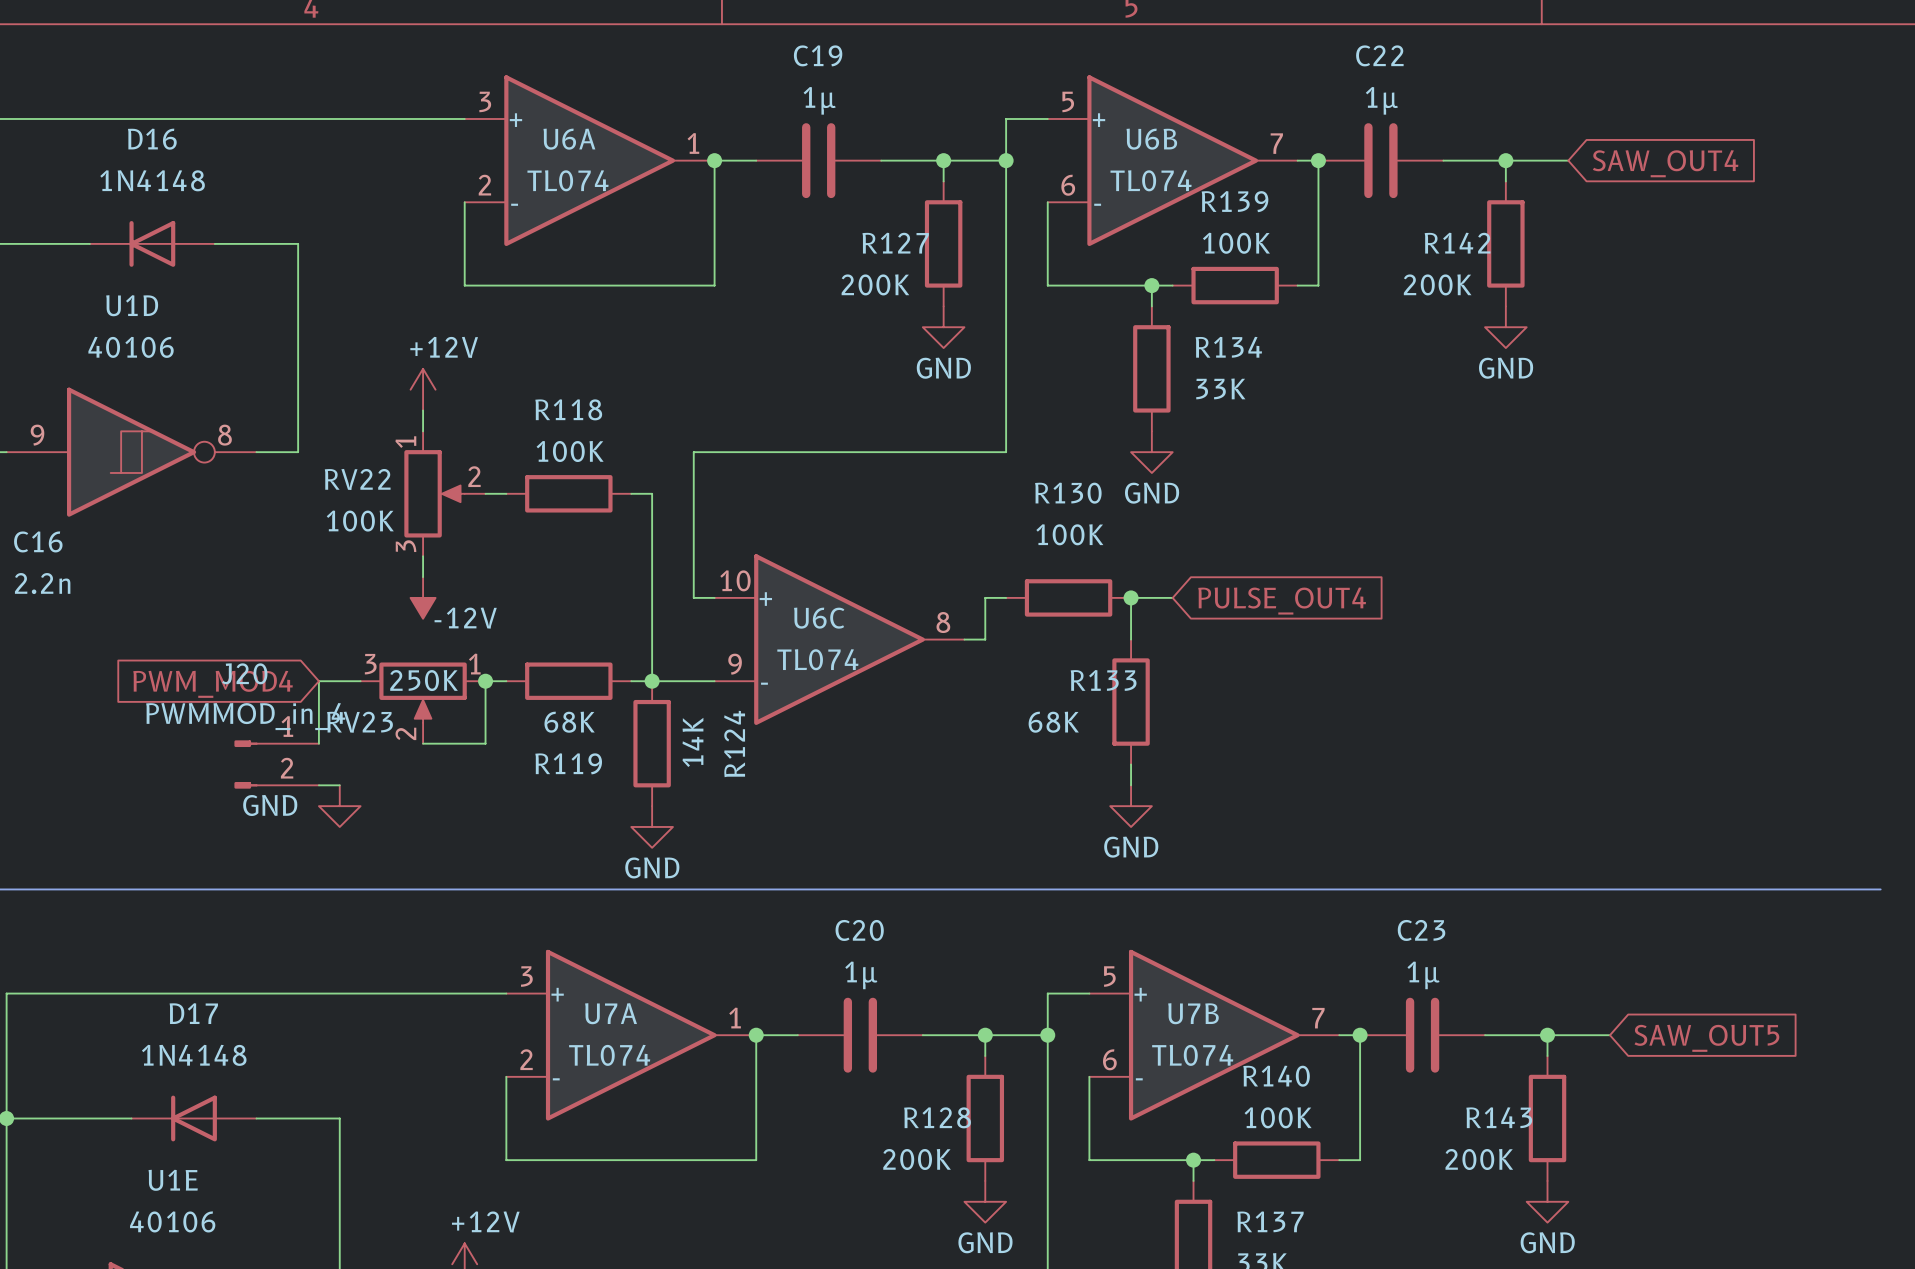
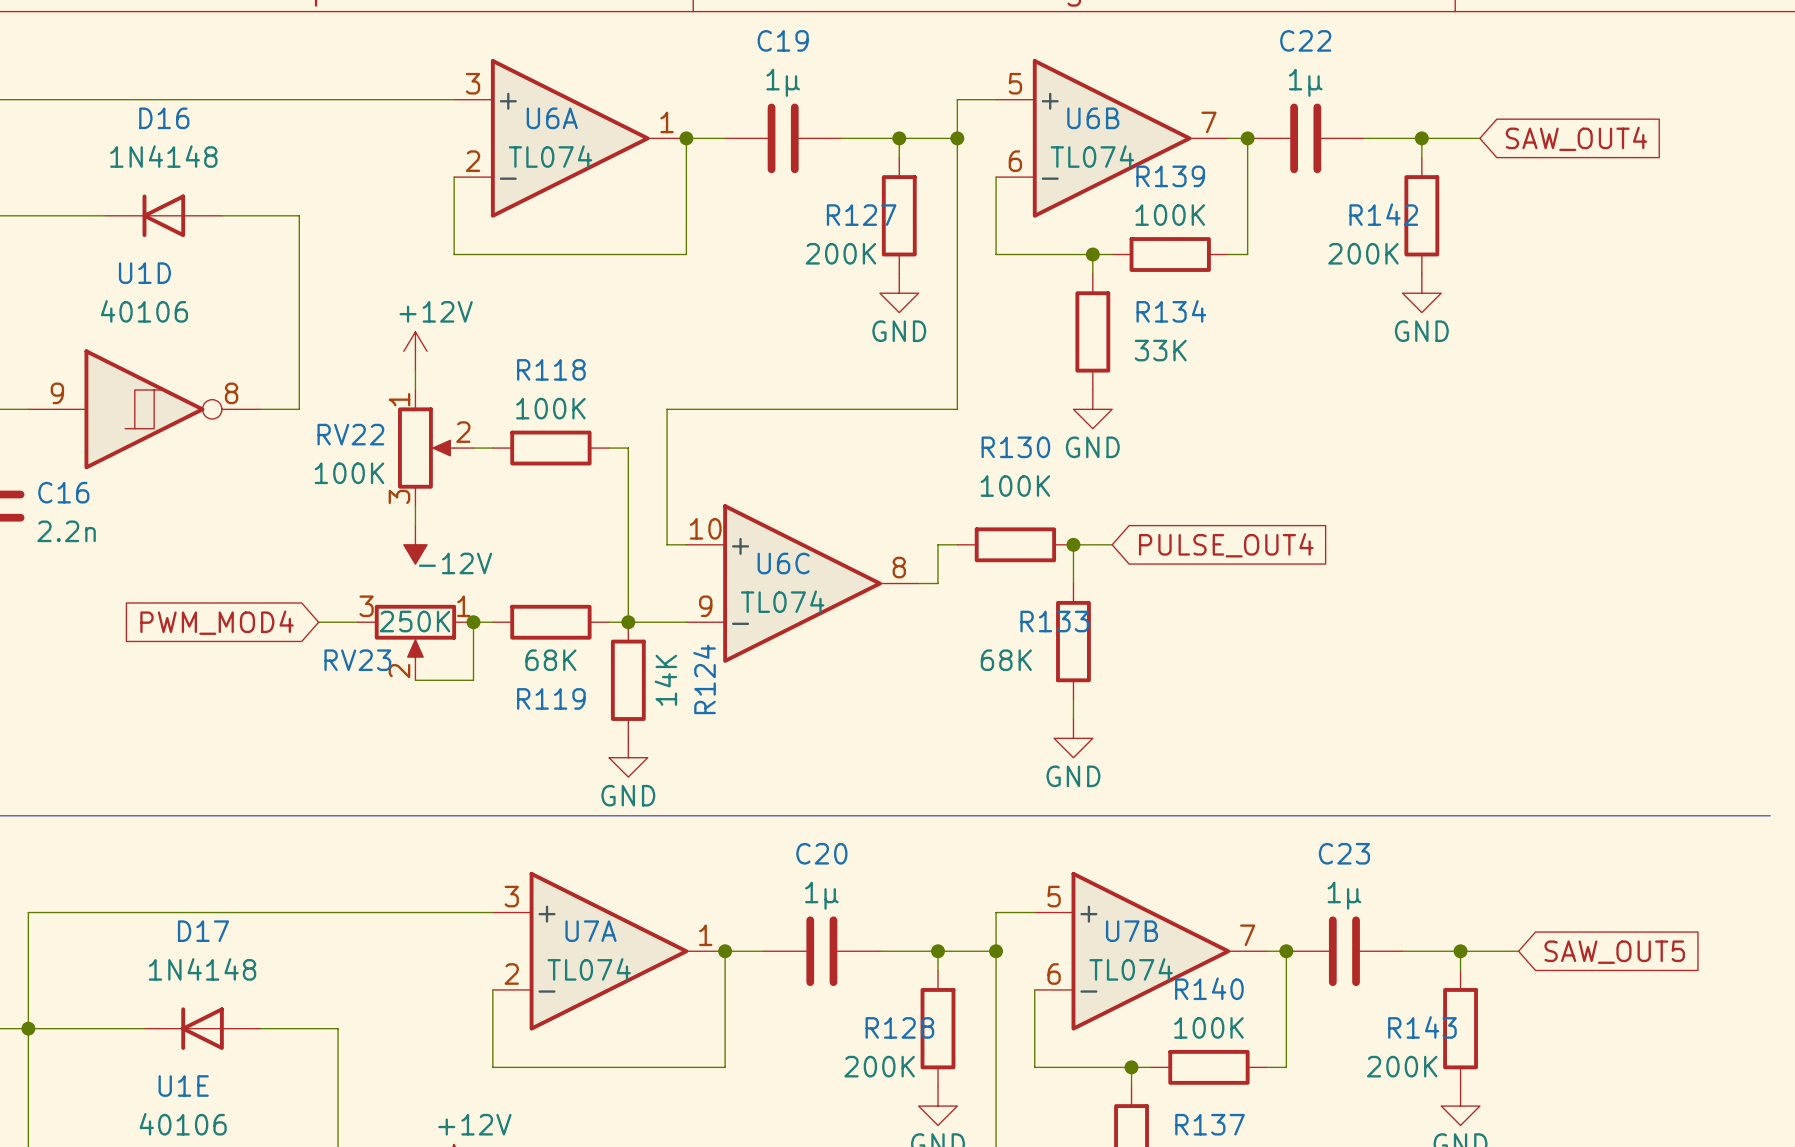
wire: (318, 681) (318, 743) -> none
J20: PWMMOD_in_4 (276, 764) -> none
wire: (318, 785) (339, 785) -> none
power symbol: GND (339, 806) -> none

